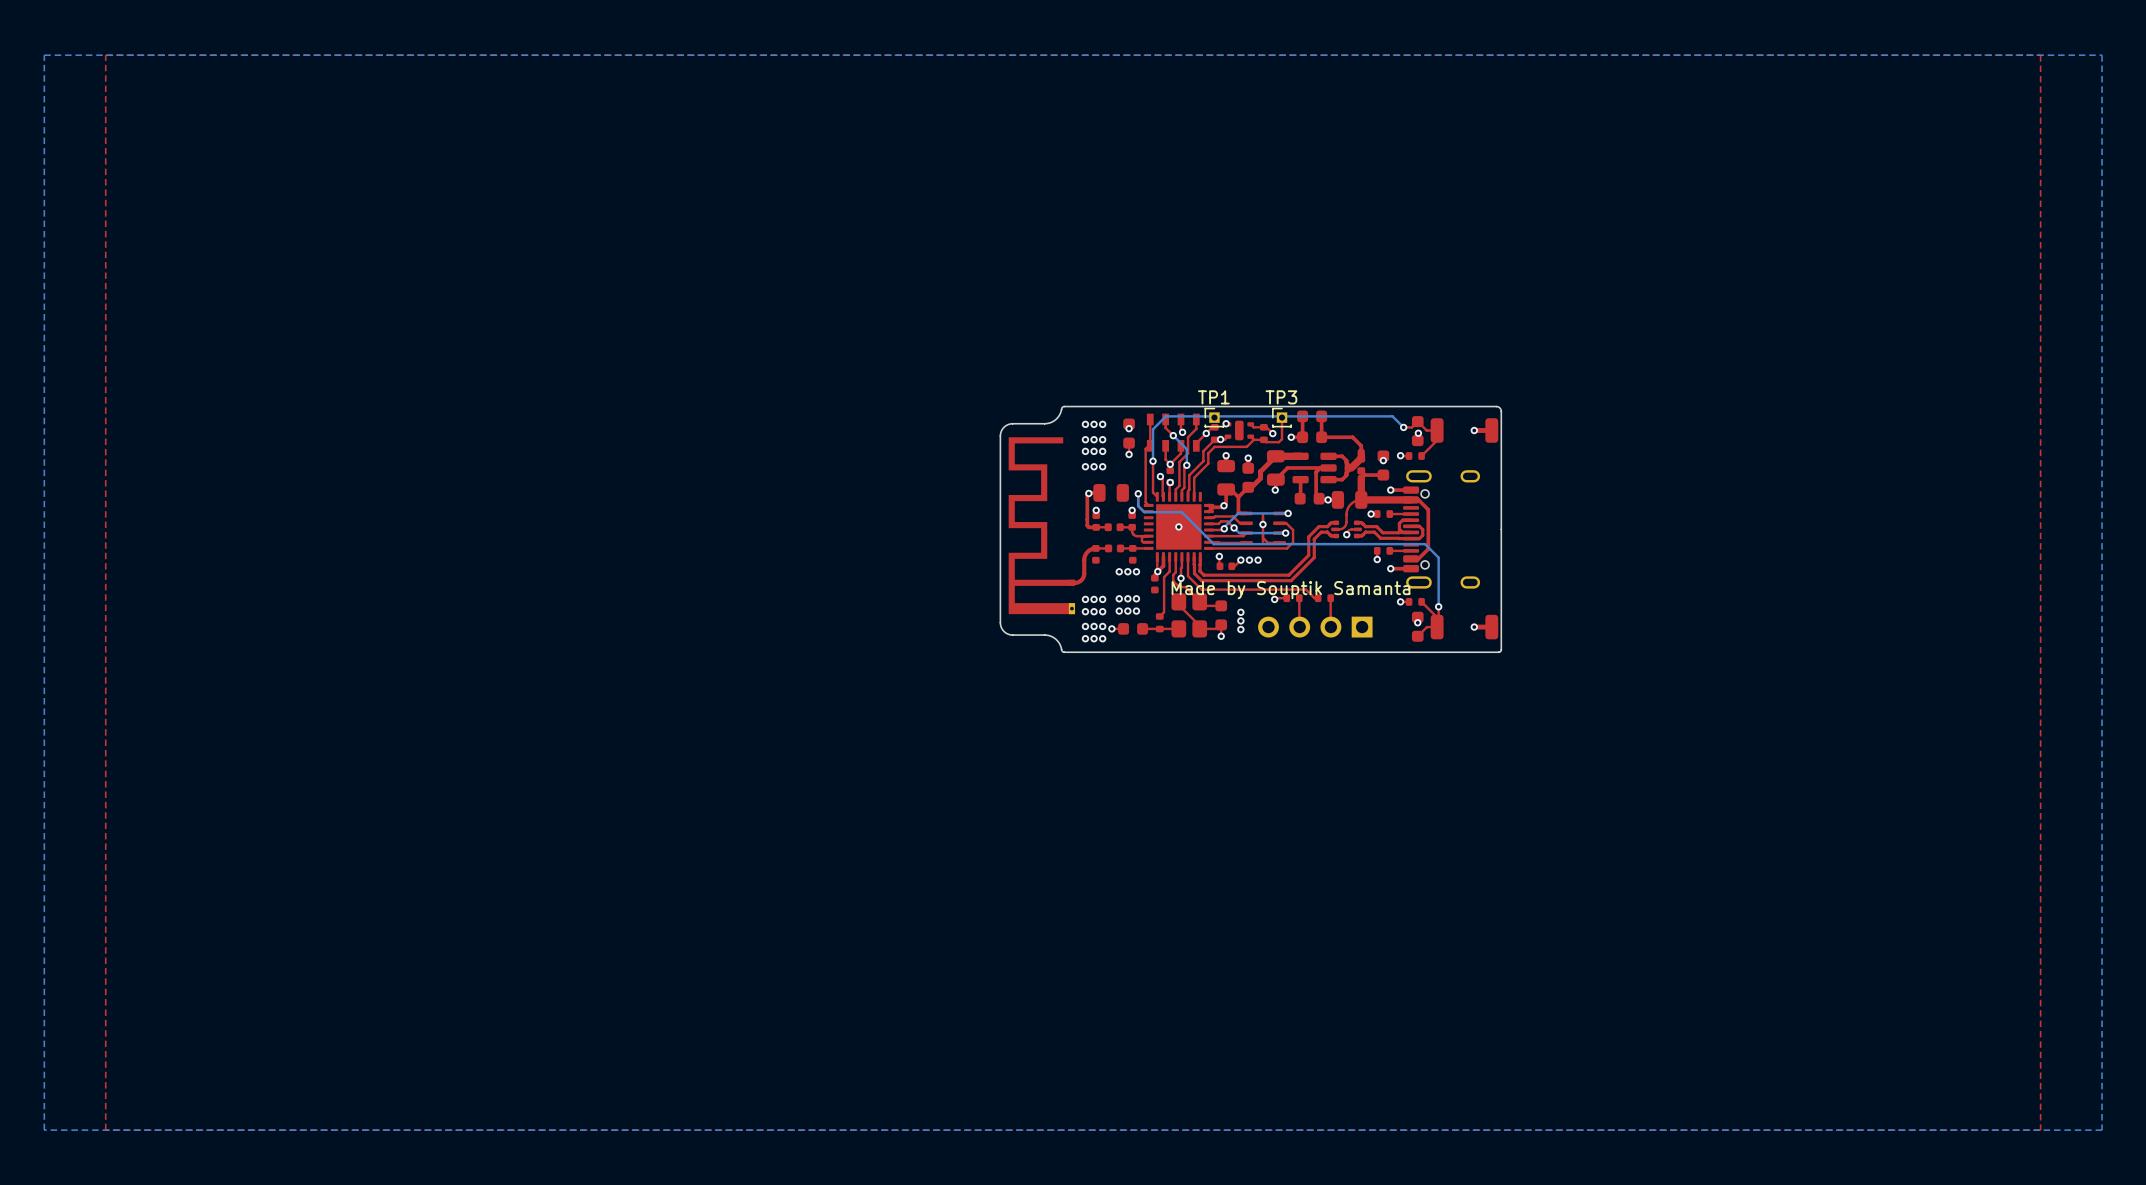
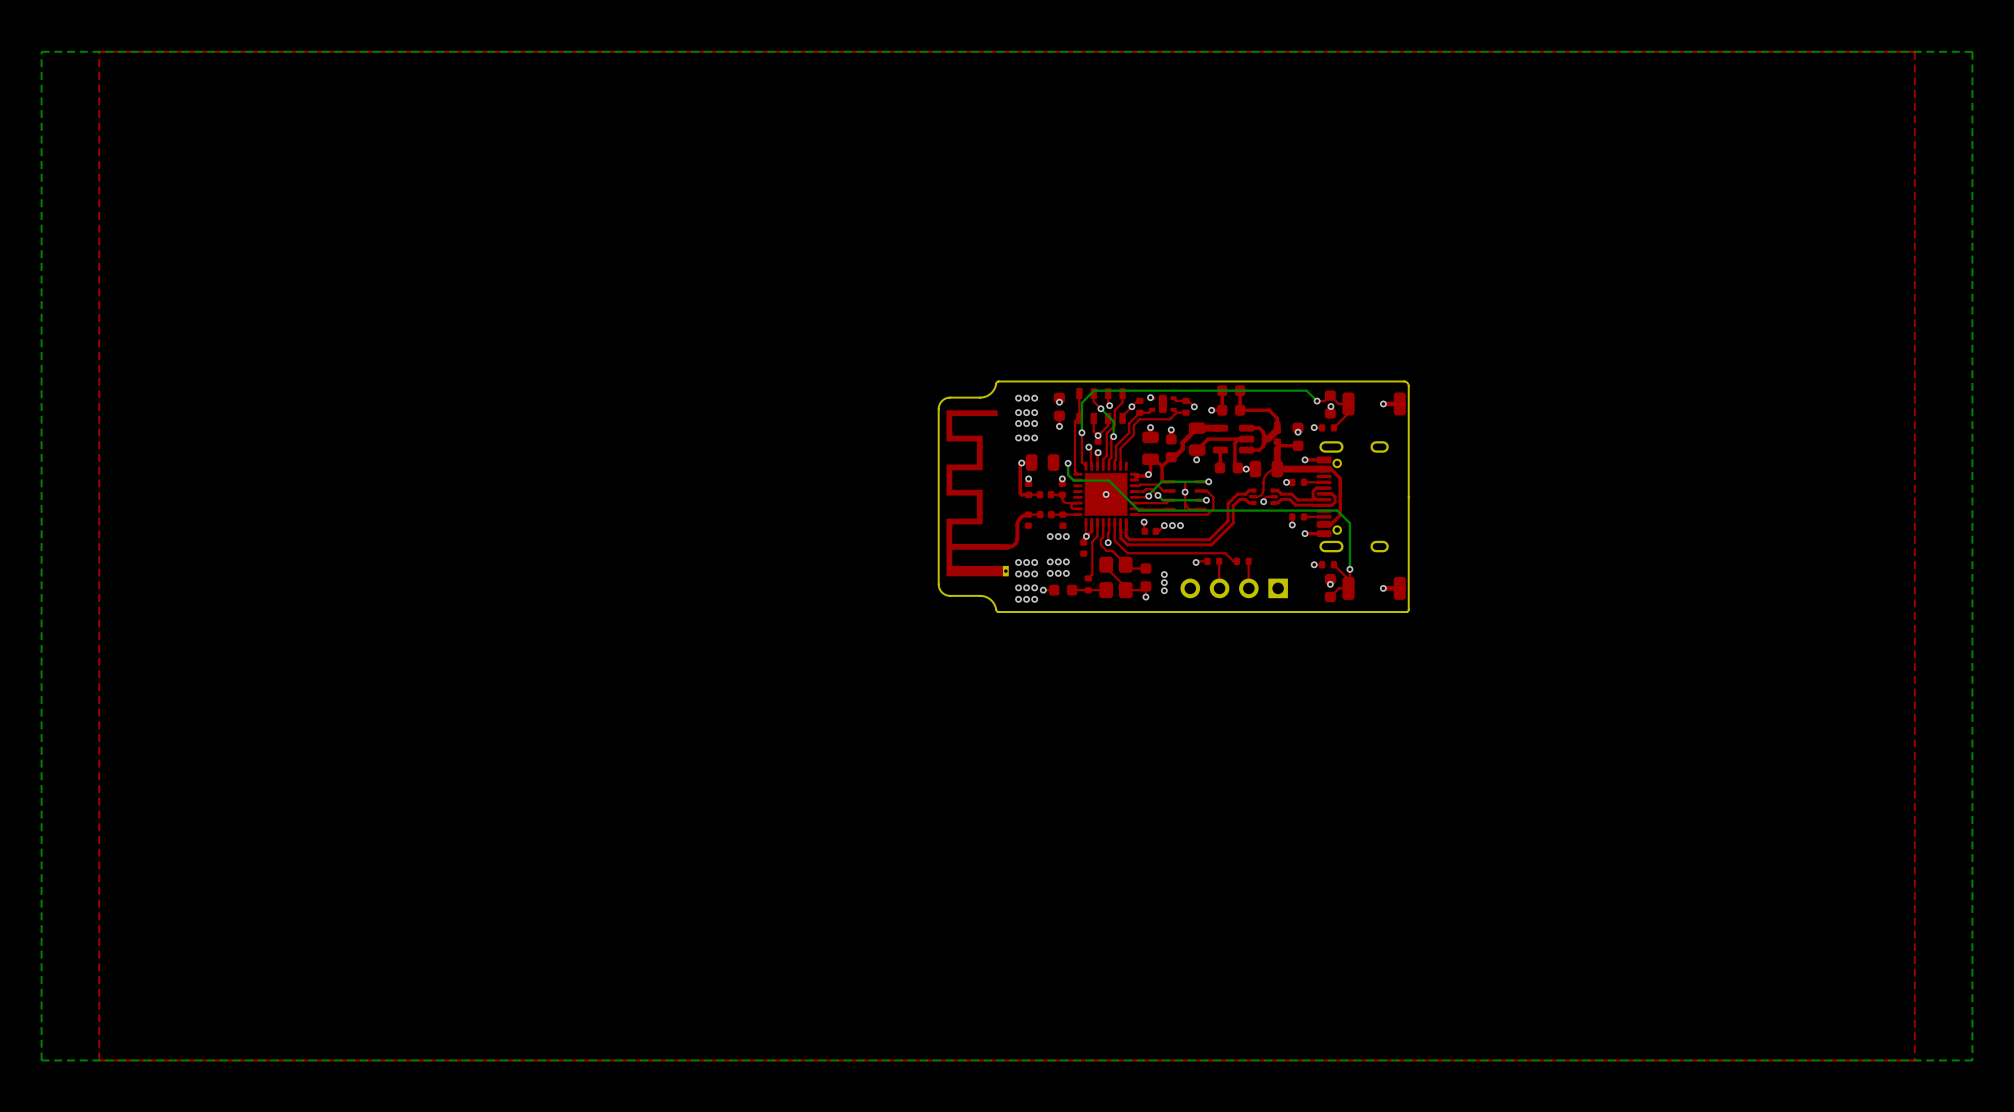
TP1: (1214, 417) -> none
top track: (1282, 417) (1282, 439) (1278, 442) (1266, 442) (1263, 439) -> none
TP3: (1282, 417) -> none
via: (1220, 439) -> none
text: Made by Souptik Samanta (1290, 590) -> none

